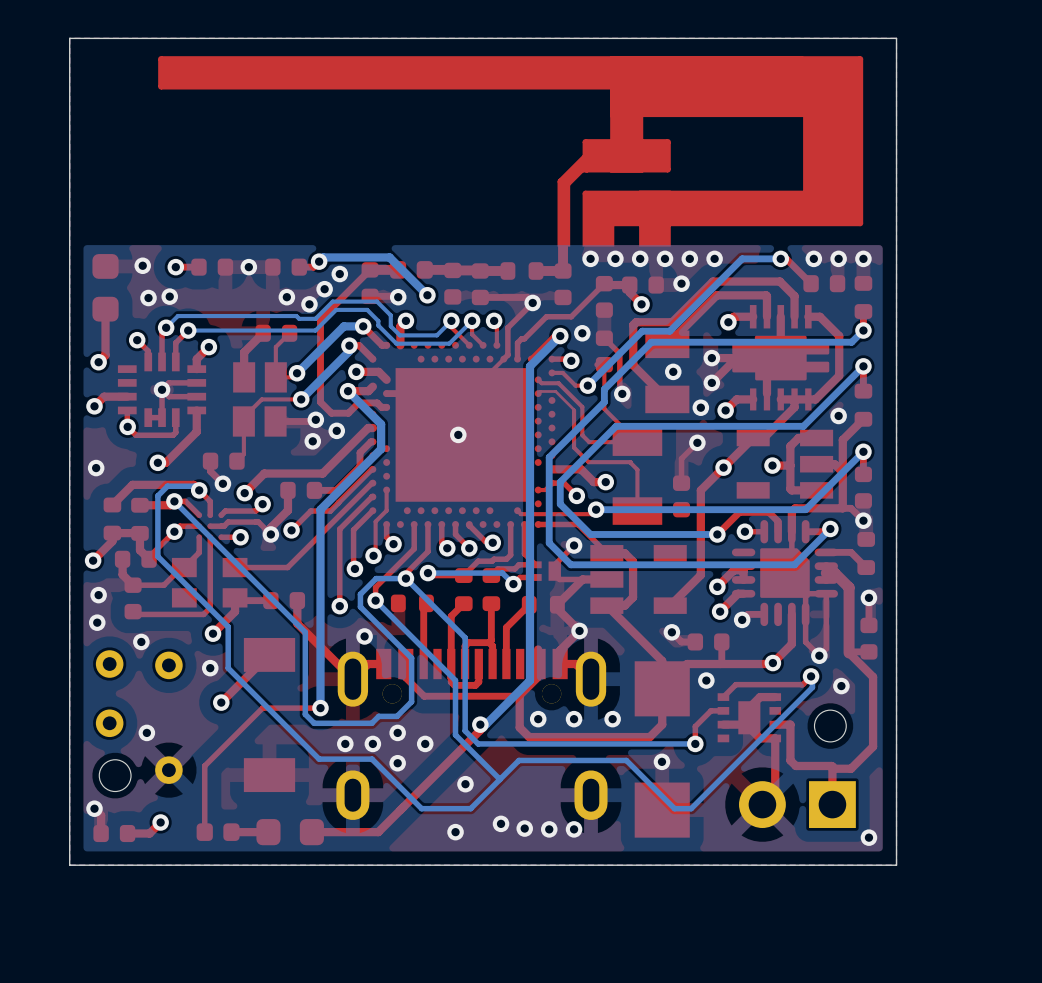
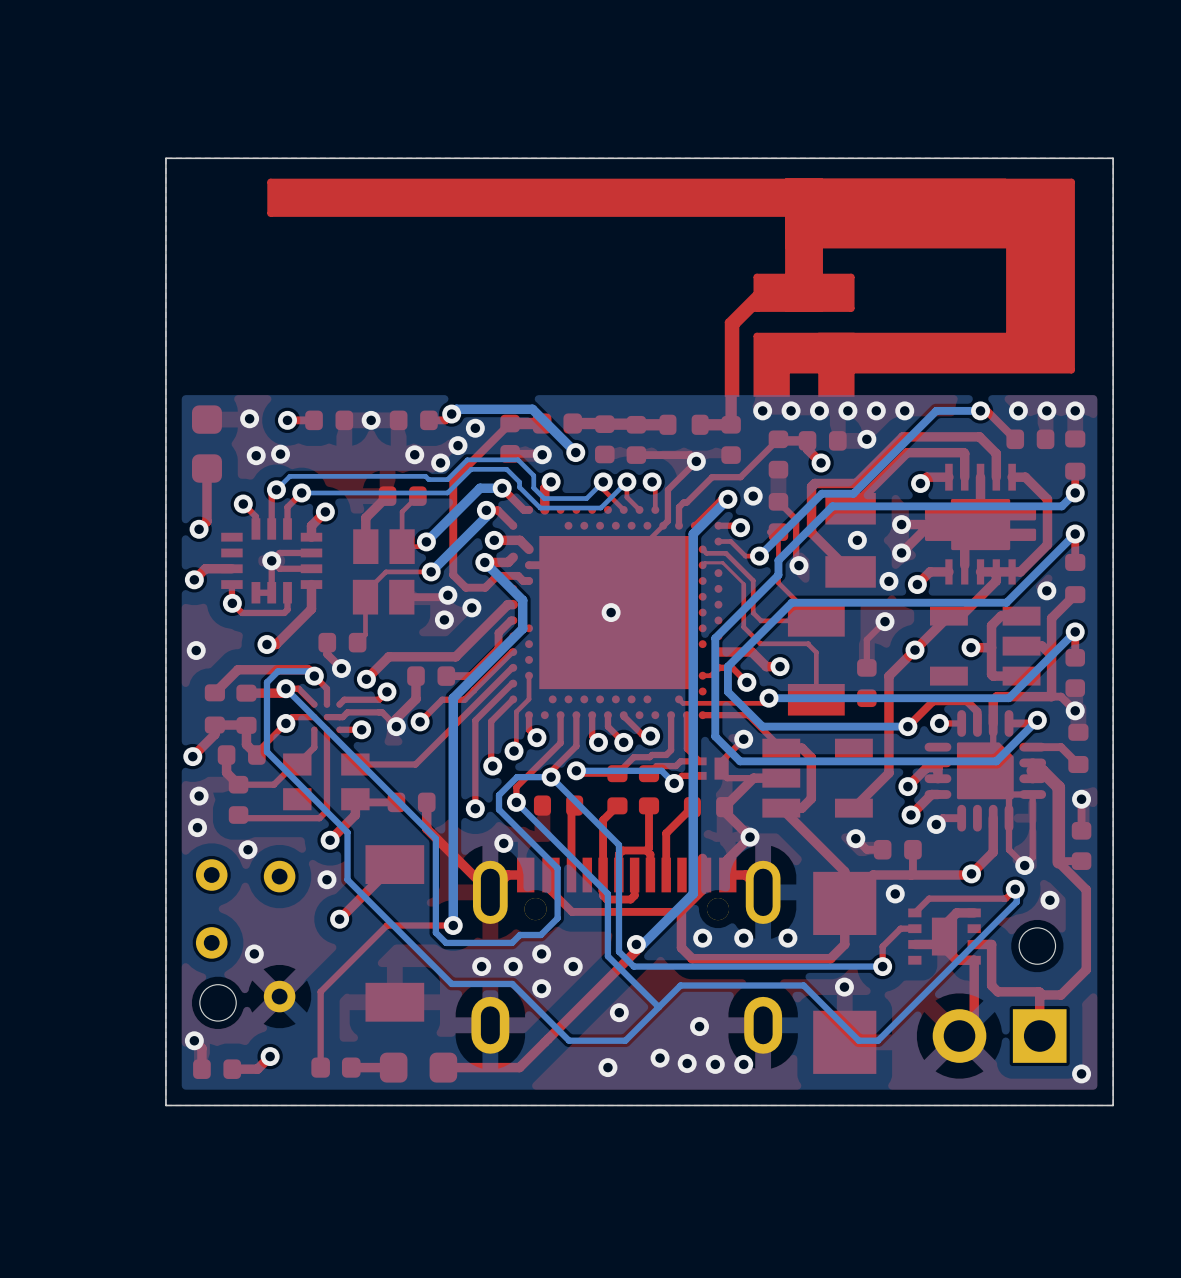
via: none -> (699, 1026)

